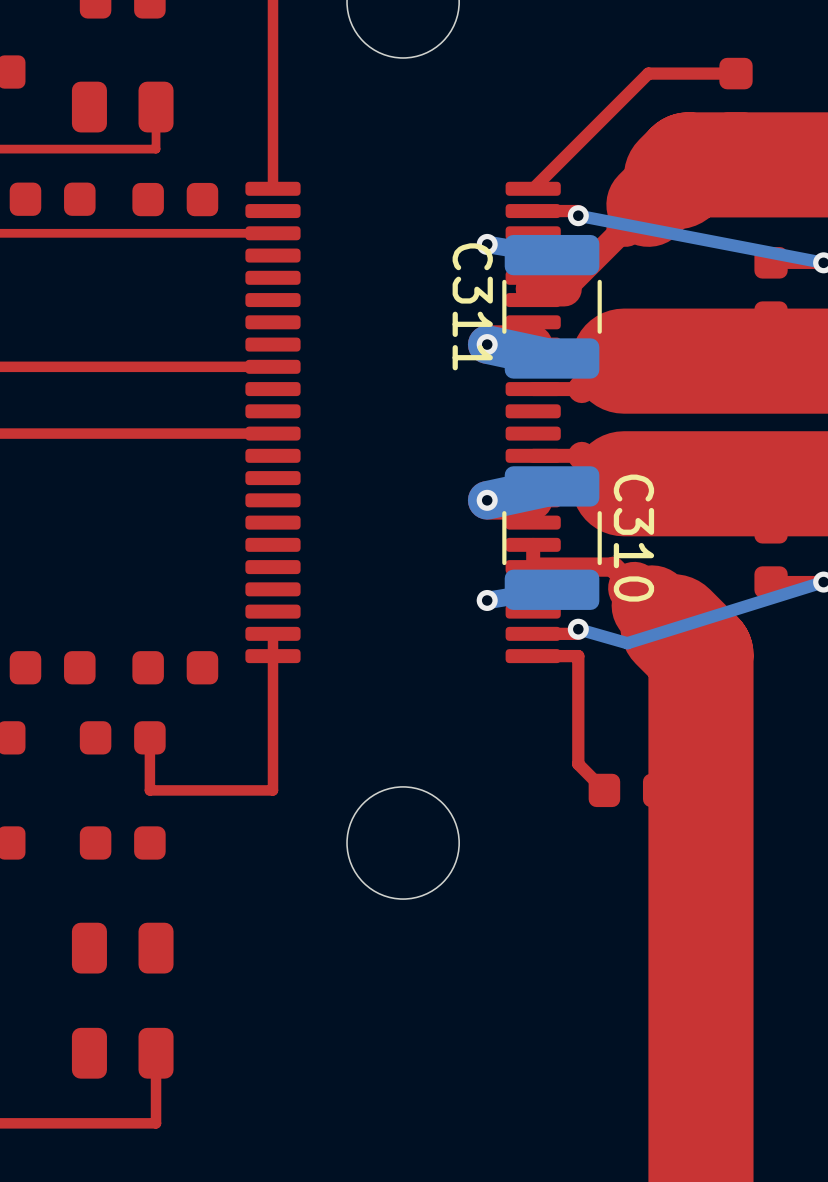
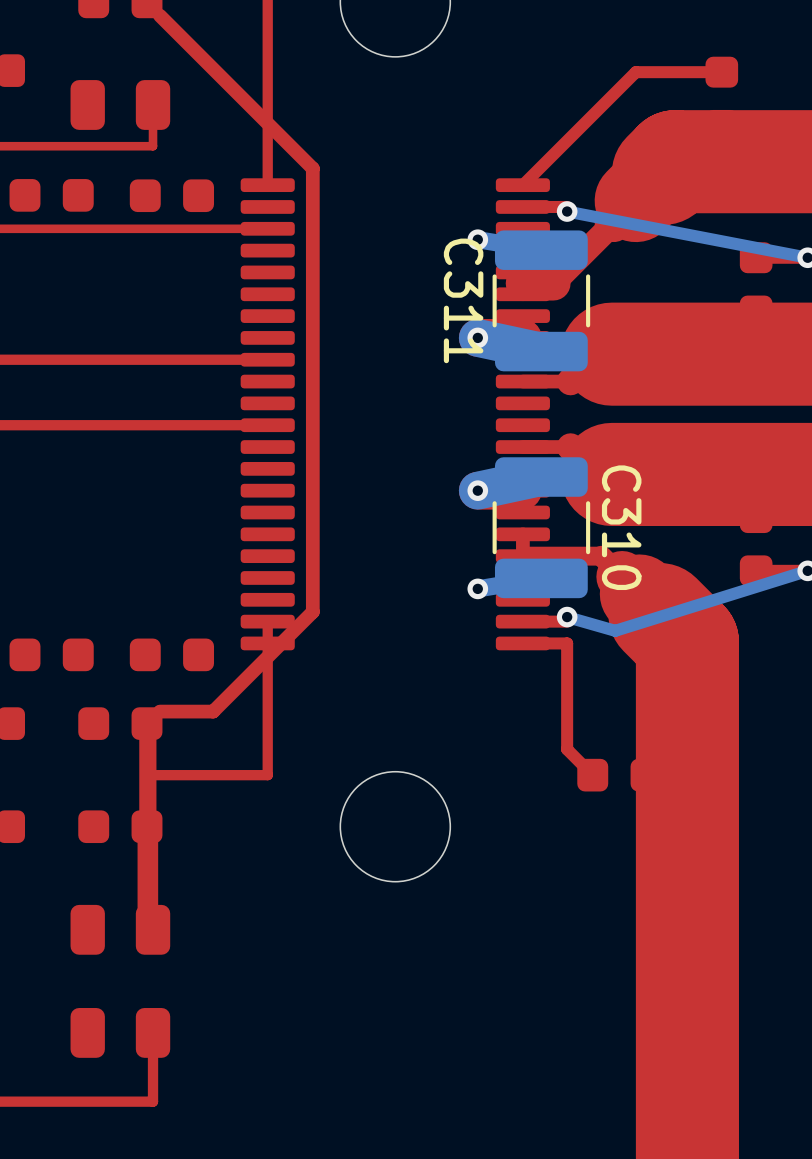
top track: none -> (159, 15) (312, 168) (312, 611) (213, 711) (159, 711)
top track: none -> (147, 737) (147, 812)
top track: none -> (147, 840) (147, 907)

